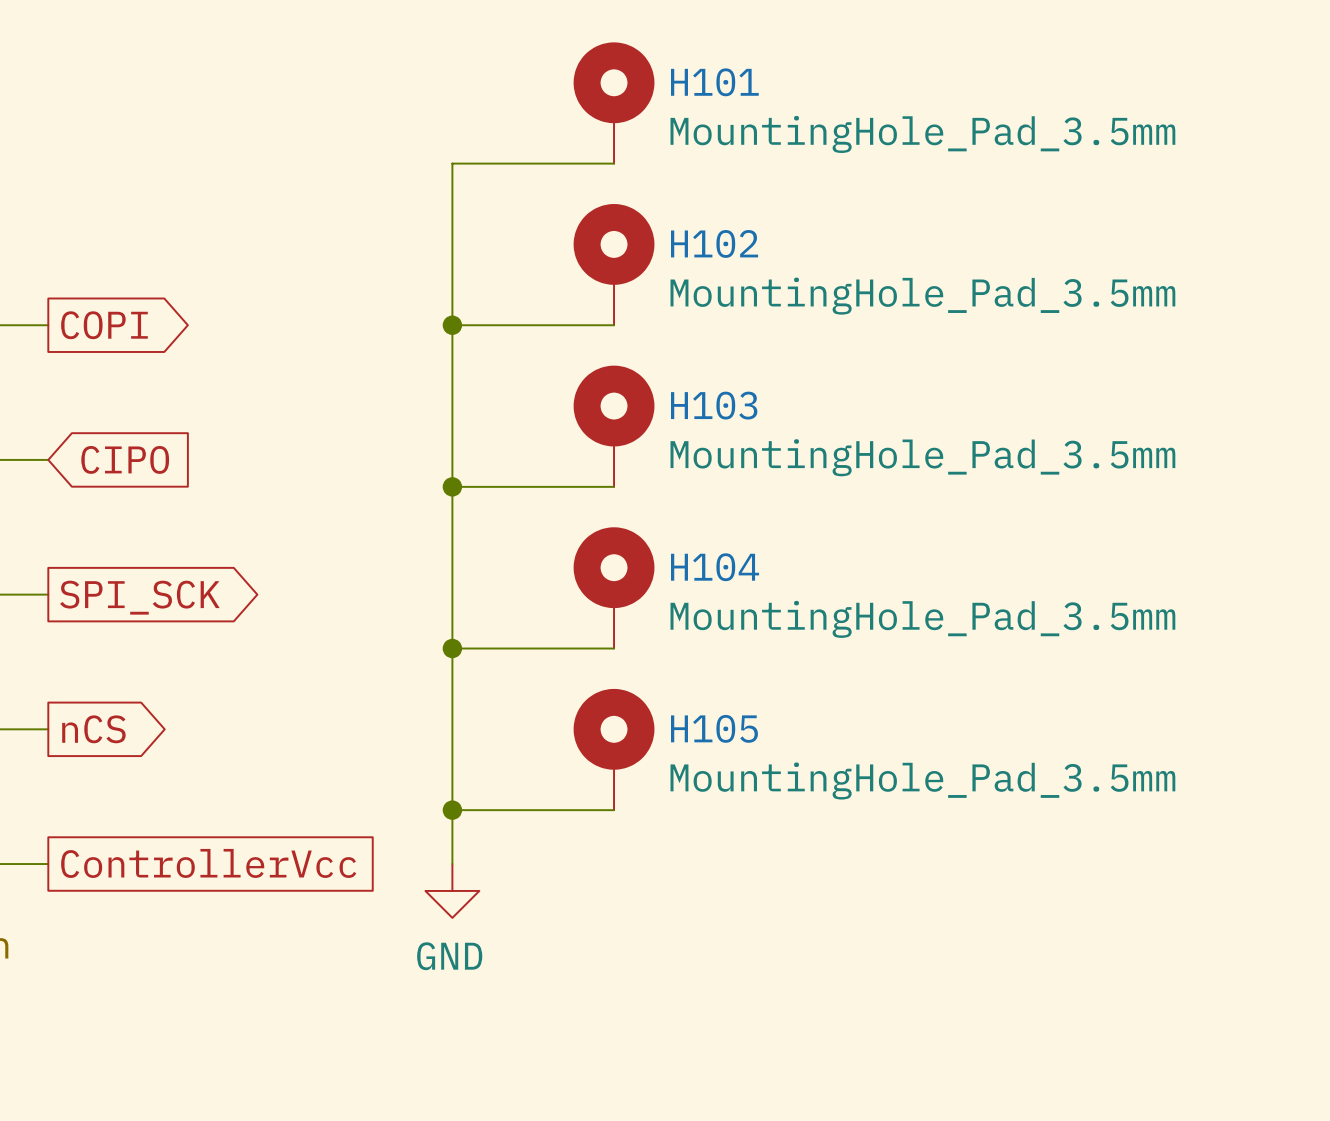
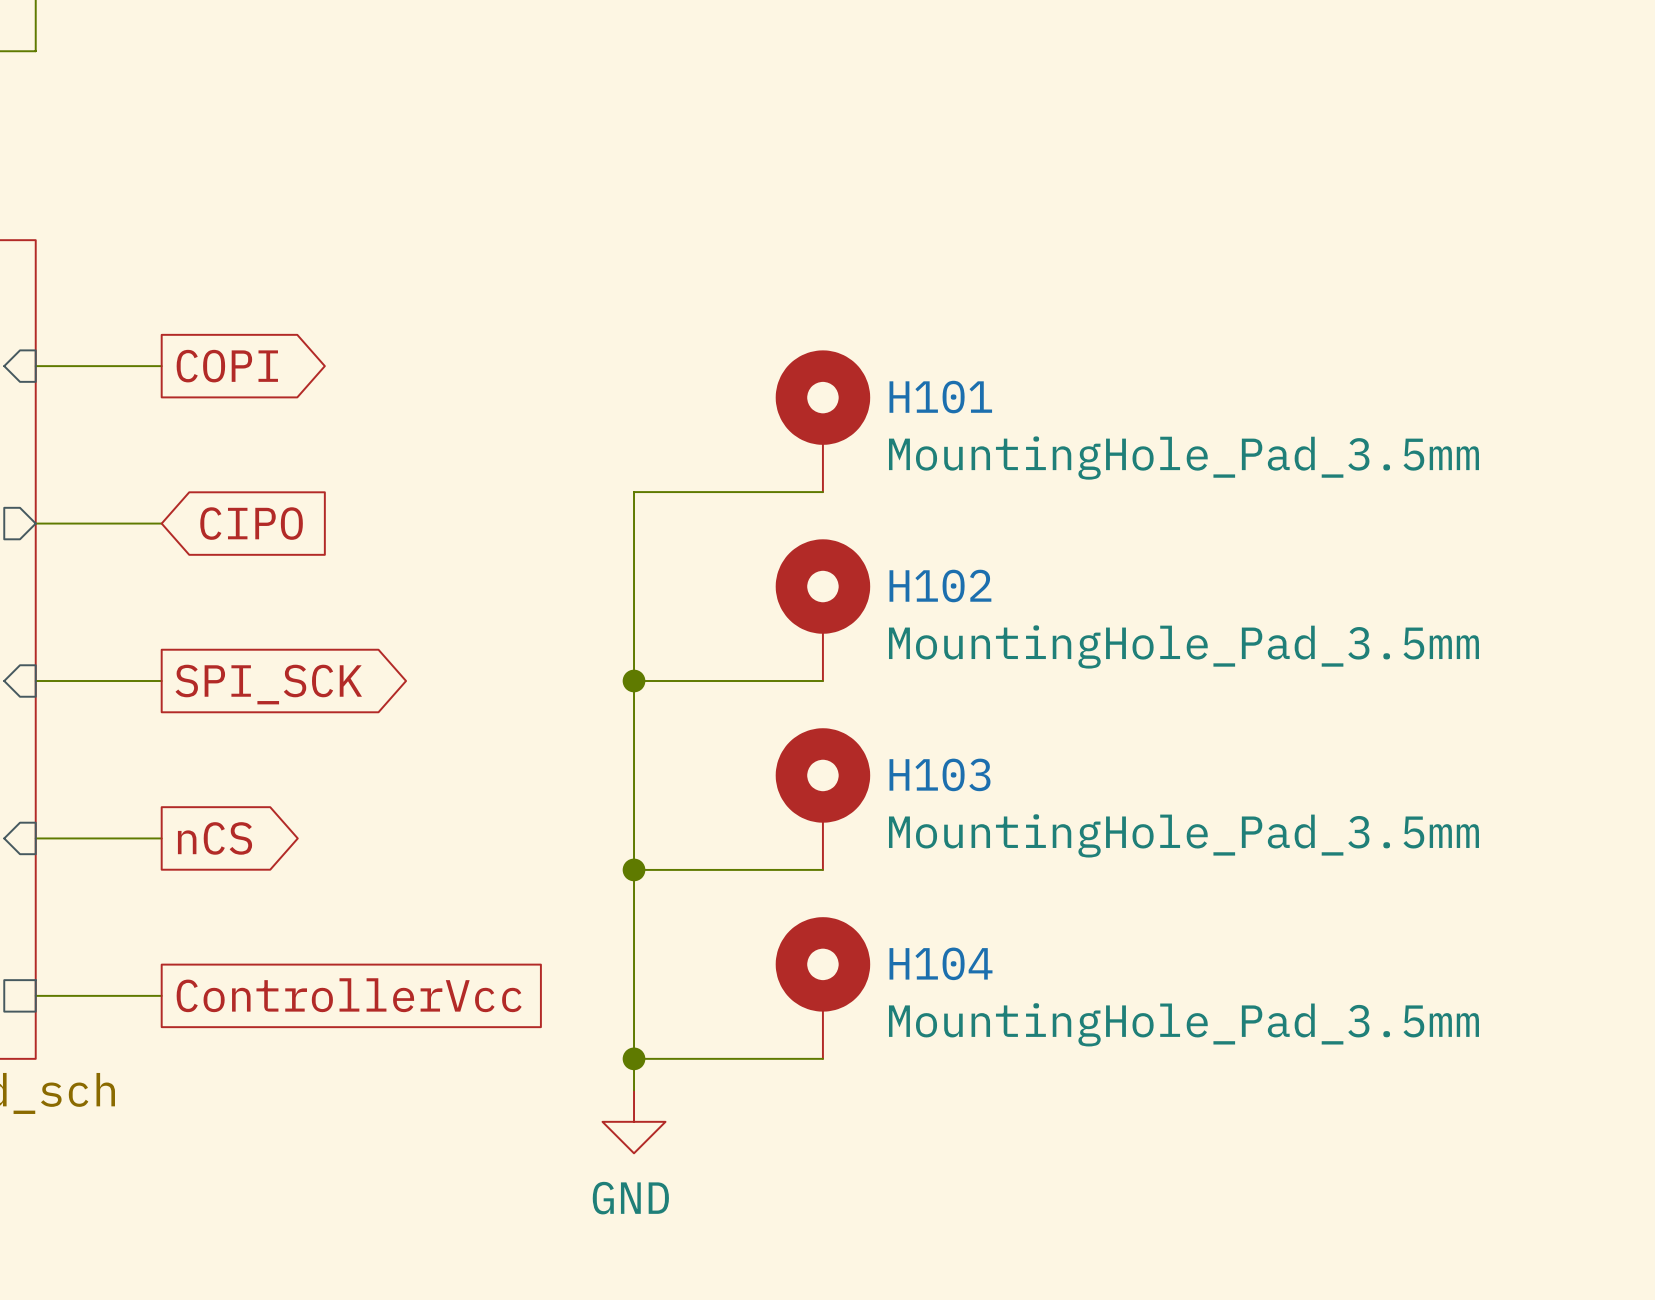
H101 position: (614, 102) -> (822, 421)
wire: (614, 163) (452, 163) (452, 432) -> (822, 492) (634, 492)
H102 position: (614, 264) -> (822, 610)
wire: (452, 325) (614, 325) -> none
junction: (452, 325) -> none
H103 position: (614, 426) -> (822, 799)
wire: (452, 486) (614, 486) -> (634, 681) (822, 681)
junction: (452, 486) -> none
H104 position: (614, 587) -> (822, 988)
junction: none -> (634, 681)
wire: (452, 648) (614, 648) -> (634, 869) (822, 869)
junction: (452, 648) -> none
H105: MountingHole_Pad_3.5mm (614, 749) -> none
junction: none -> (634, 869)
wire: (452, 810) (614, 810) -> (634, 1058) (822, 1058)
junction: (452, 810) -> none
wire: none -> (634, 995) (634, 1090)
power symbol position: GND (452, 890) -> GND (634, 1121)
junction: none -> (634, 1058)

